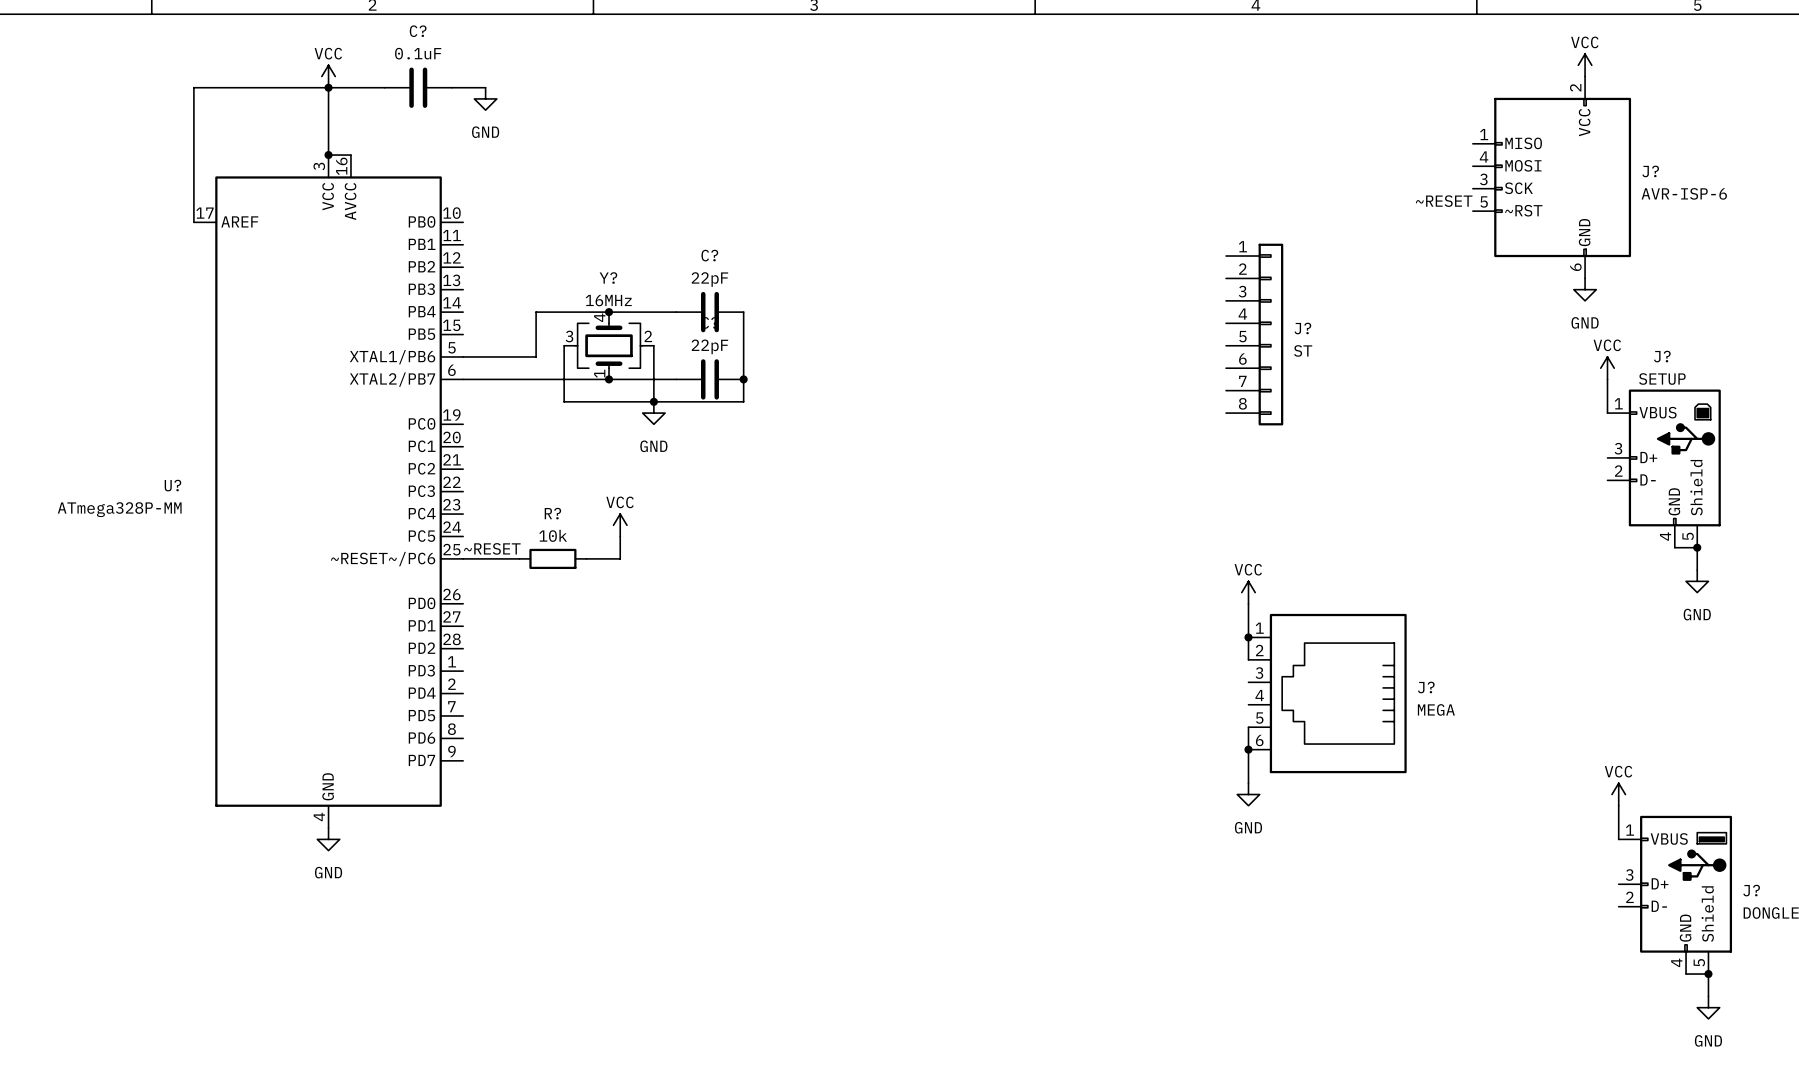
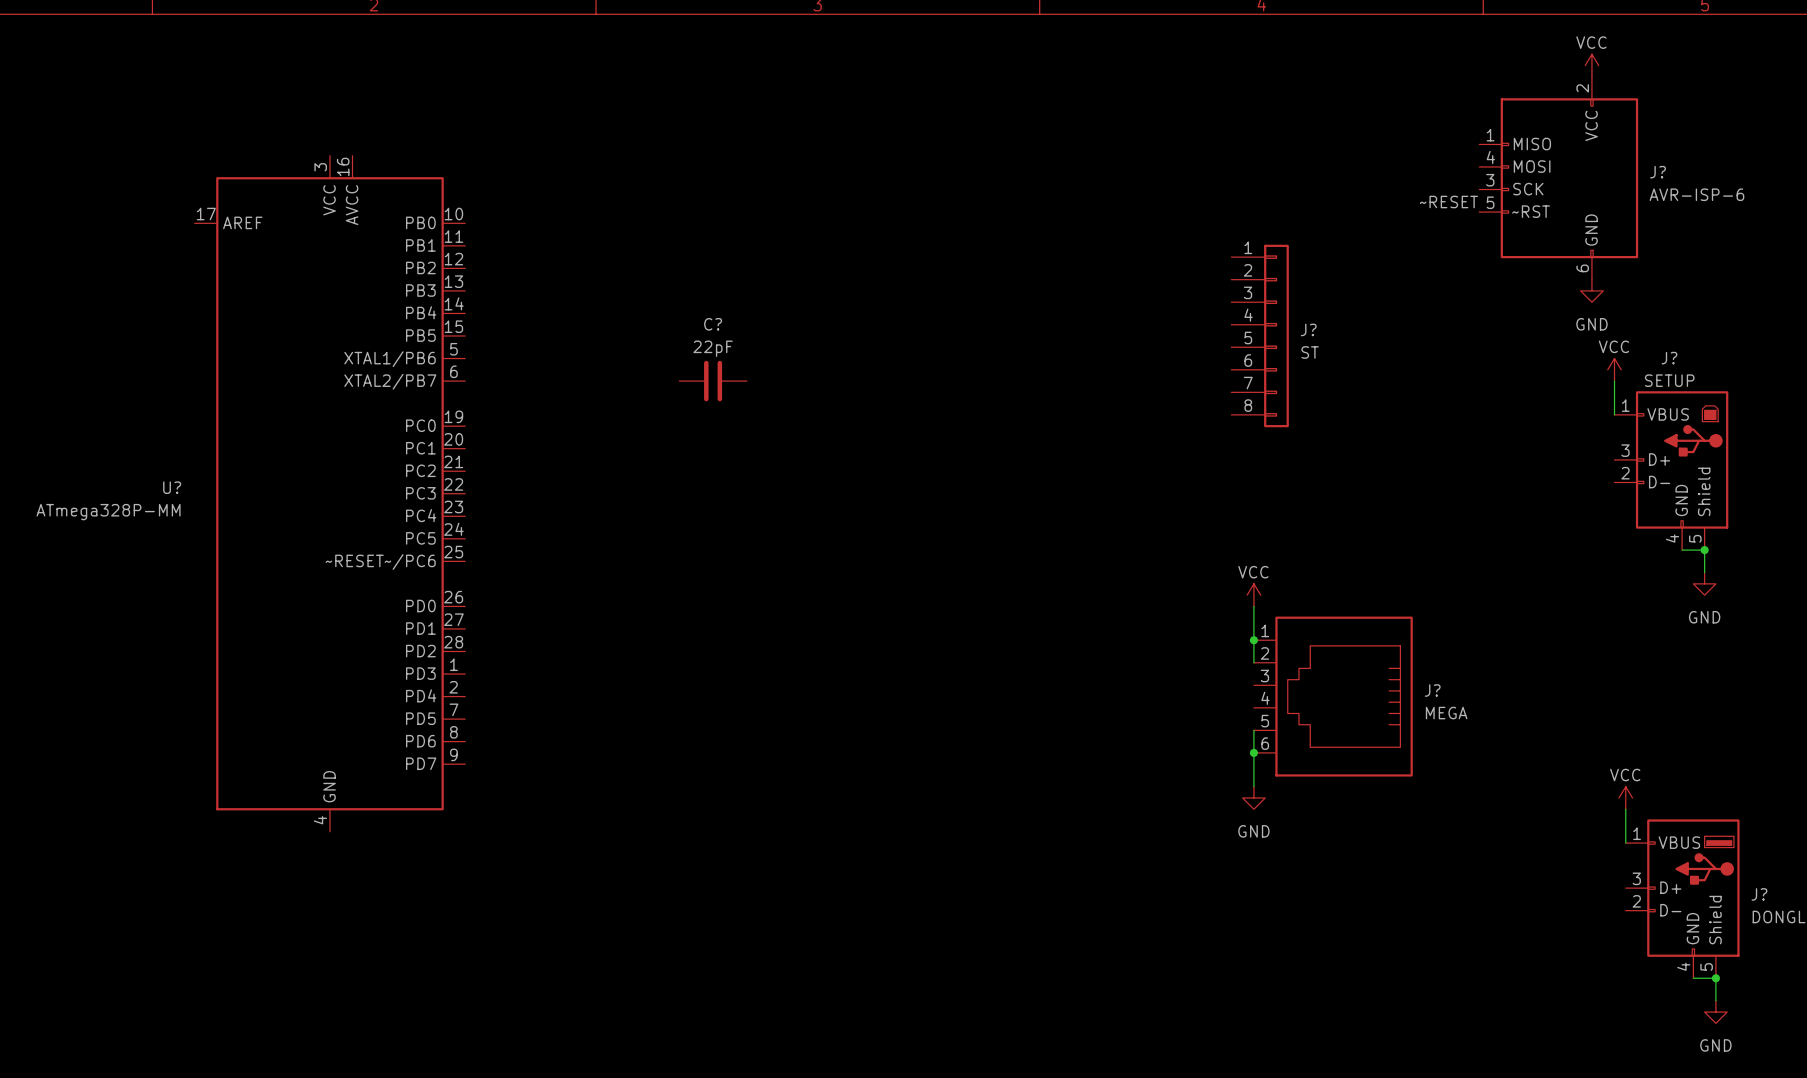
power symbol: VCC (328, 76) -> none
wire: (328, 87) (328, 155) (350, 155) -> none
junction: (328, 87) -> none
wire: (384, 87) (193, 87) (193, 222) -> none
C?: 0.1uF (418, 87) -> none
wire: (451, 87) (485, 87) -> none
power symbol: GND (485, 98) -> none
junction: (328, 155) -> none
junction: (609, 312) -> none
wire: (676, 312) (536, 312) (536, 356) (463, 356) -> none
C?: 22pF (709, 312) -> none
wire: (743, 312) (743, 401) (564, 401) (564, 345) -> none
Y?: 16MHz (609, 345) -> none
wire: (653, 345) (653, 401) -> none
wire: (463, 379) (676, 379) -> none
junction: (609, 379) -> none
junction: (743, 379) -> none
junction: (653, 401) -> none
power symbol: GND (653, 413) -> none
power symbol: VCC (620, 525) -> none
wire: (620, 536) (620, 558) (586, 558) -> none
label: ~RESET (492, 548) -> none
wire: (463, 558) (519, 558) -> none
R?: 10k (552, 558) -> none
power symbol: GND (328, 839) -> none

